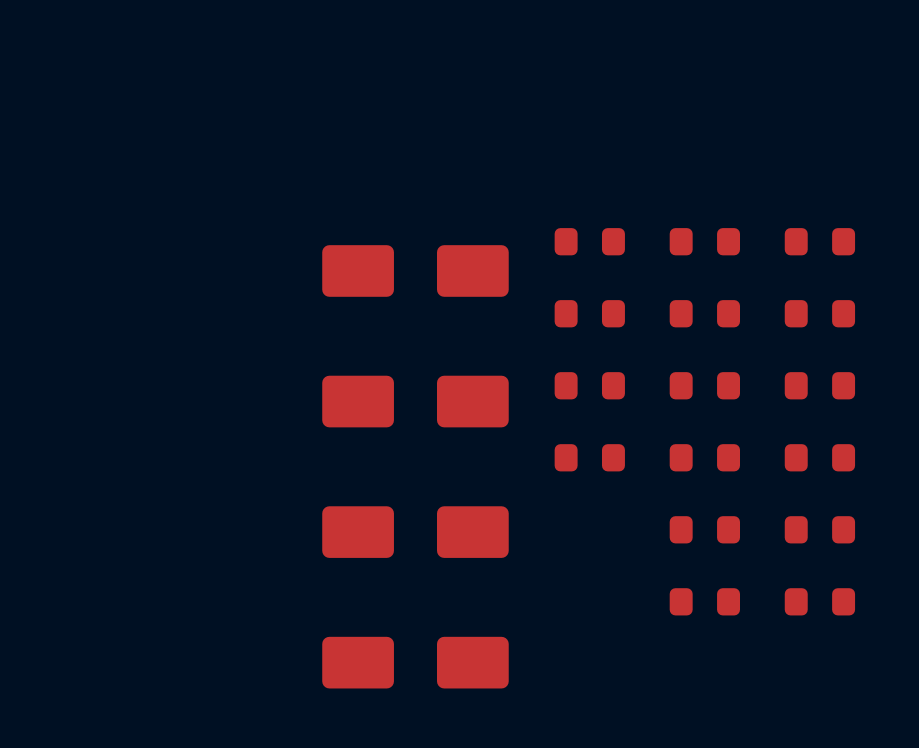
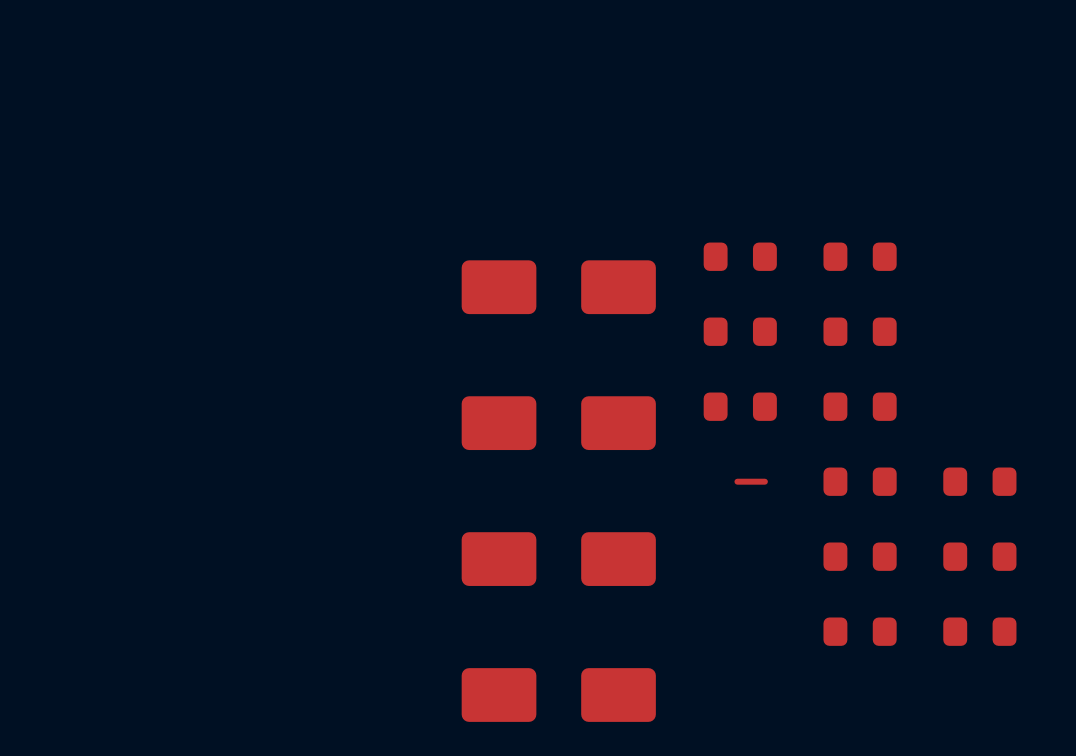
part: (819, 241) -> none
part: (819, 313) -> none
part: (819, 385) -> none
part: (589, 457) -> none
top track: none -> (764, 481) (737, 481)

